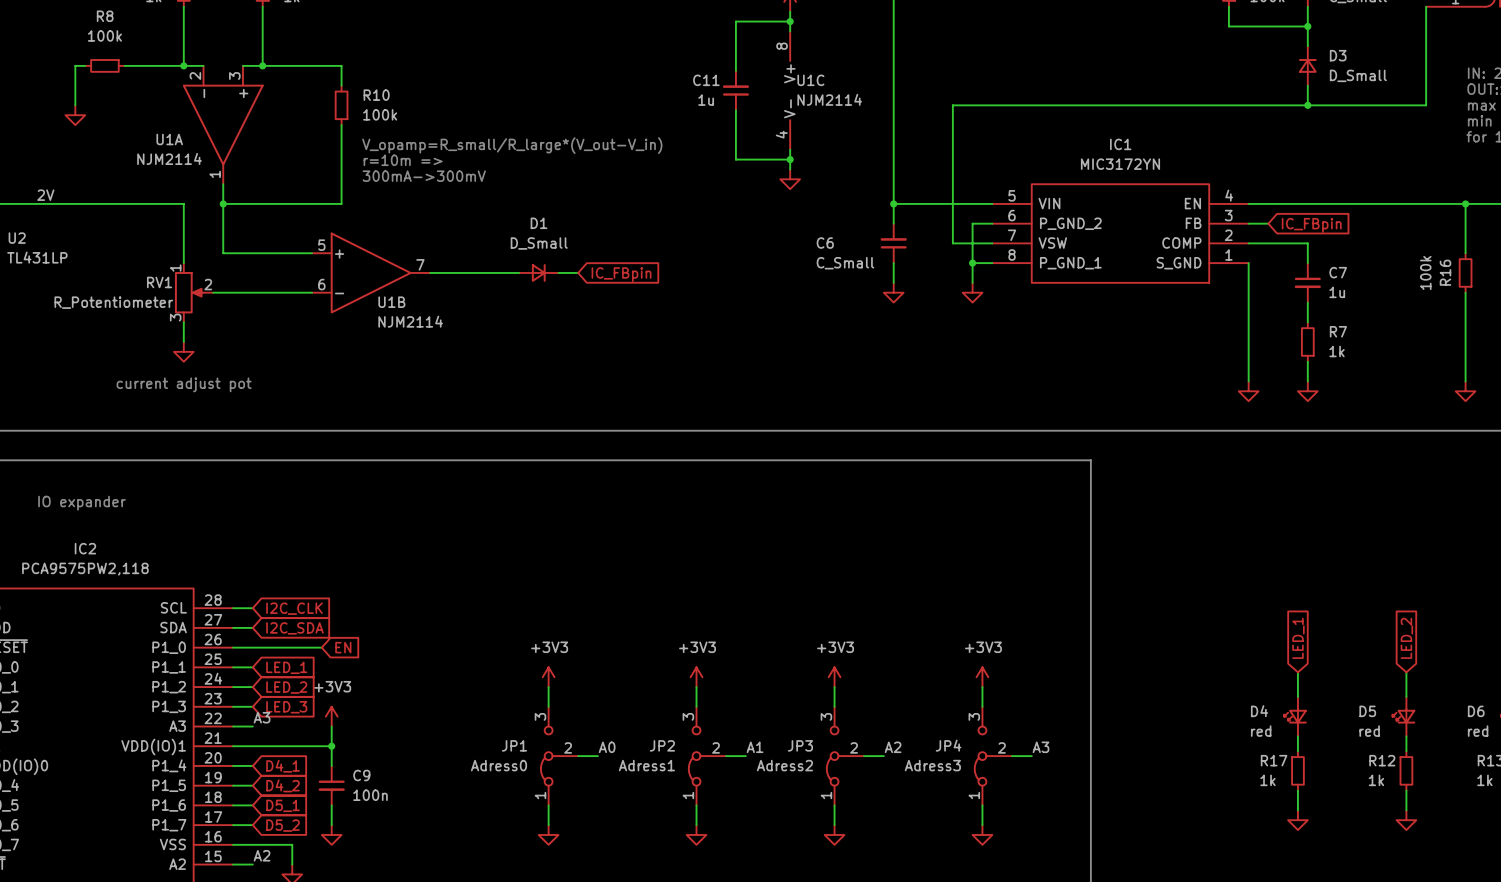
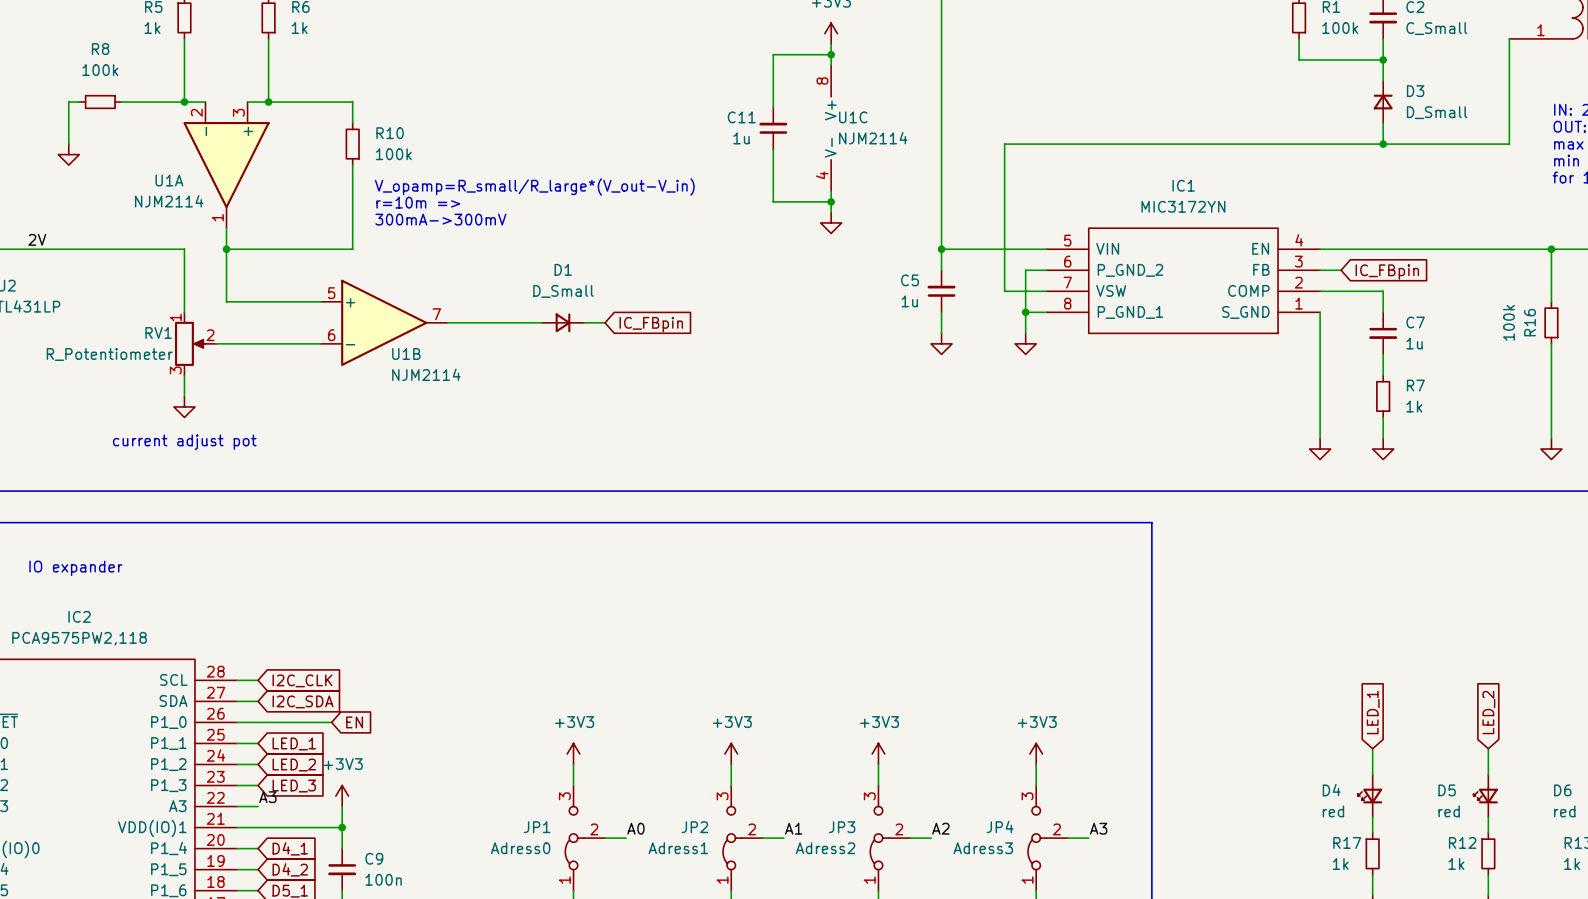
C6 name: C6 (825, 243) -> C5 (910, 280)
C6 value: C_Small (845, 263) -> 1u (909, 301)

